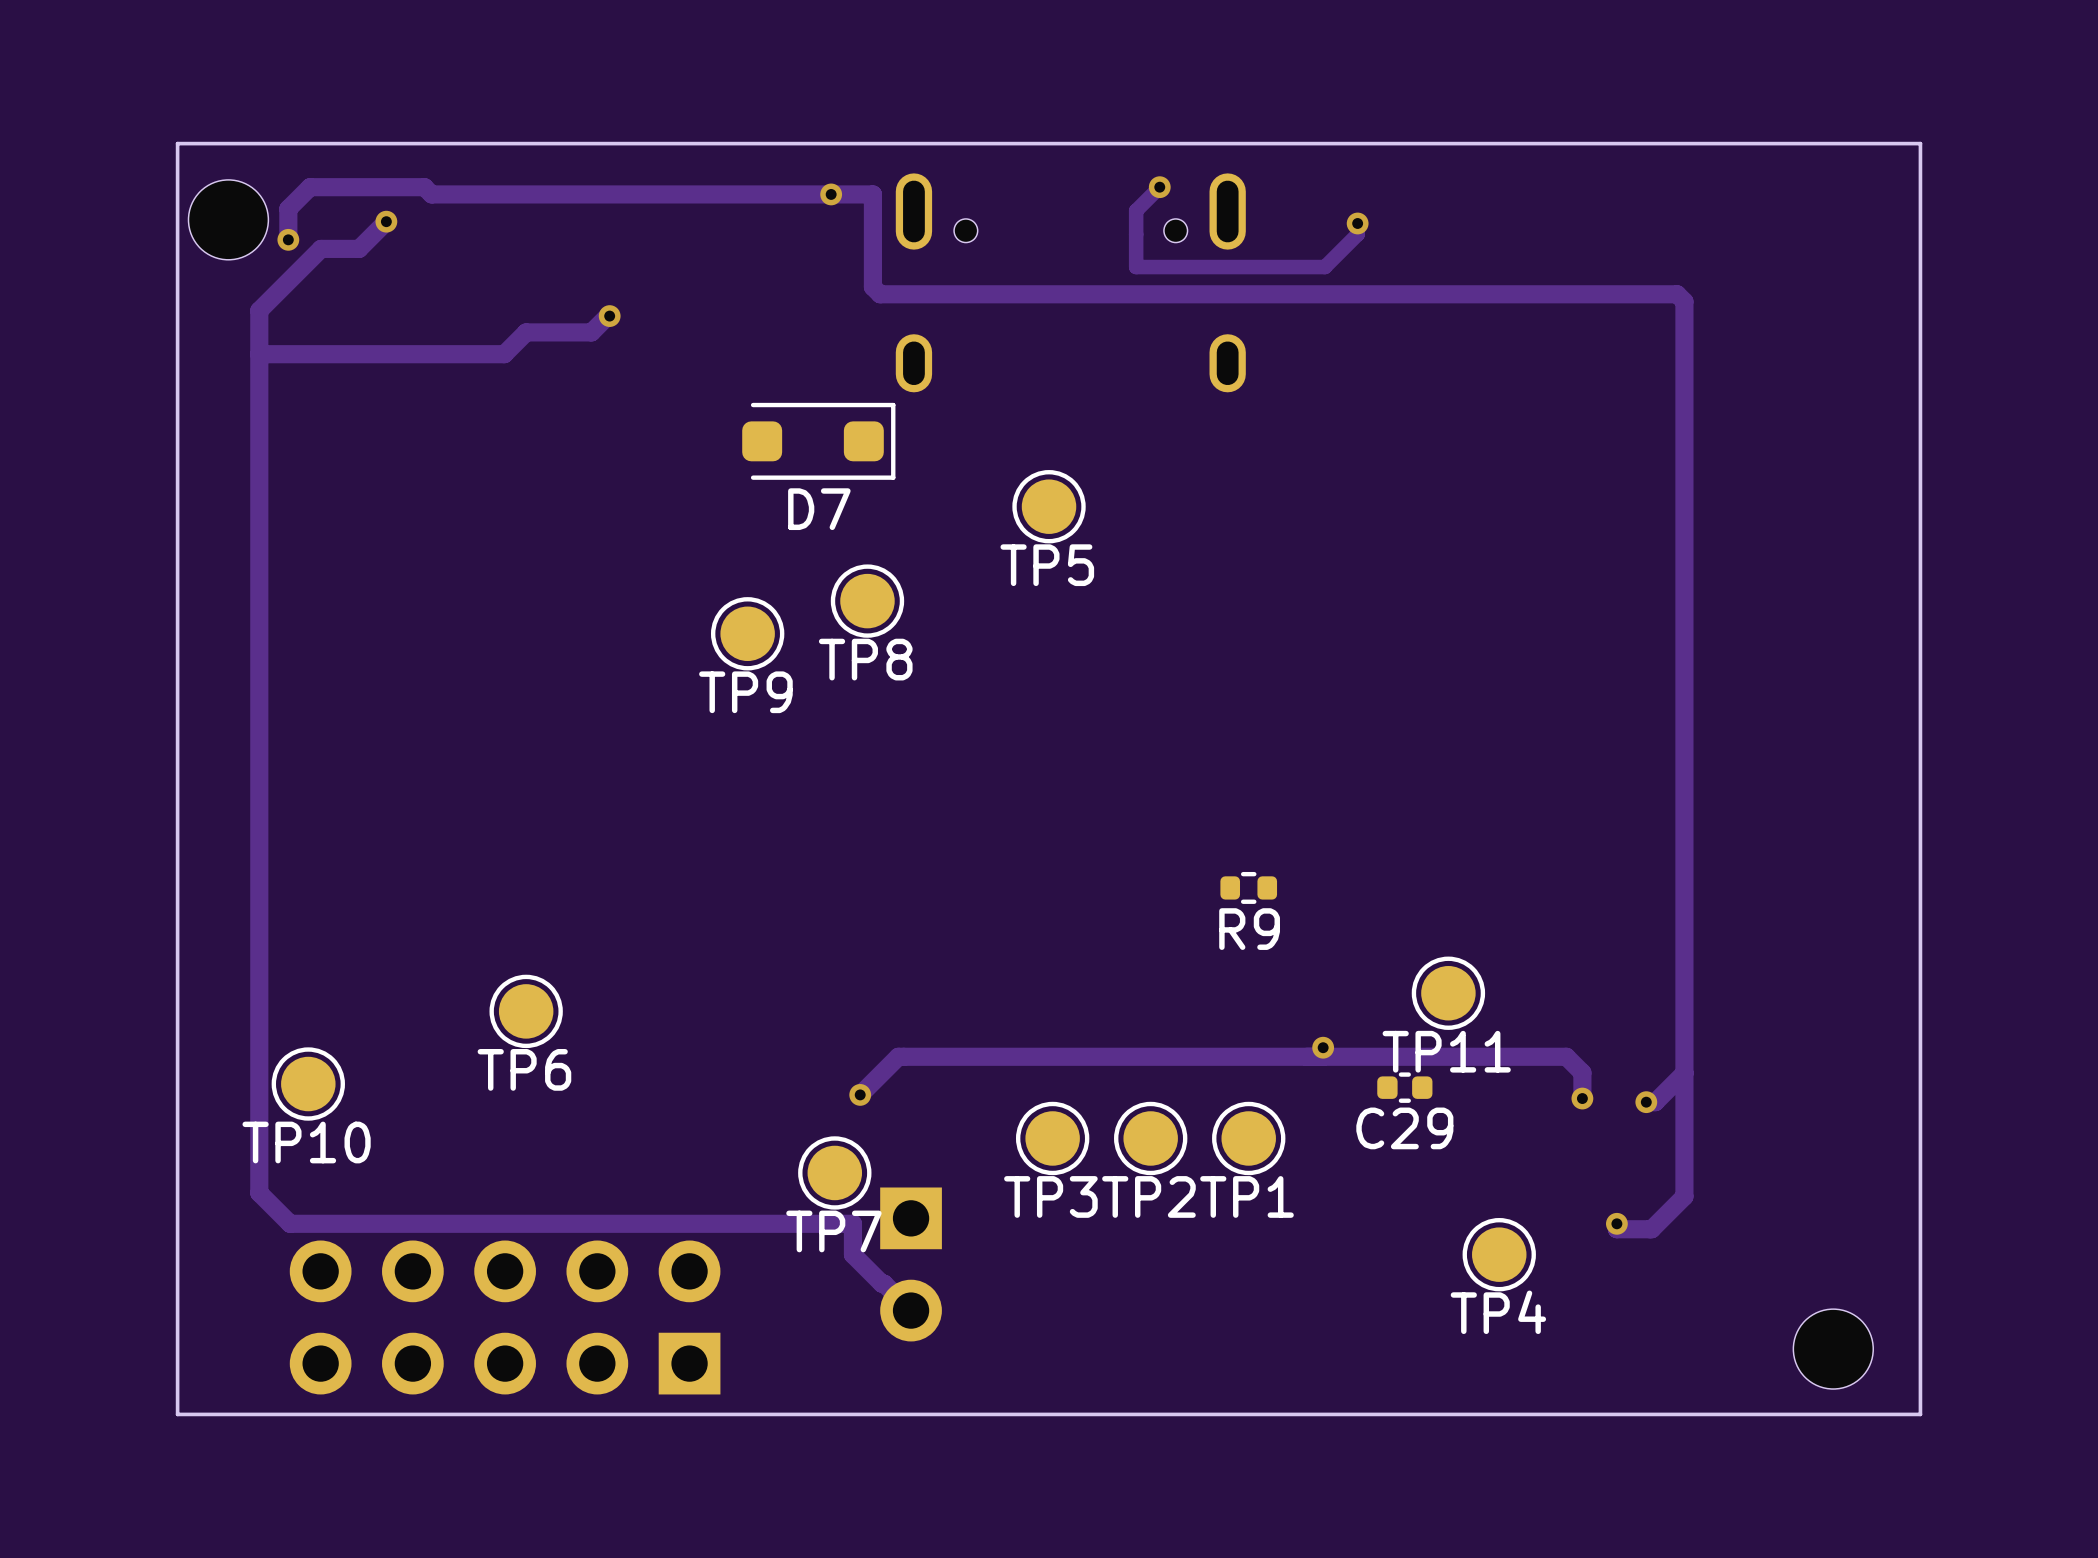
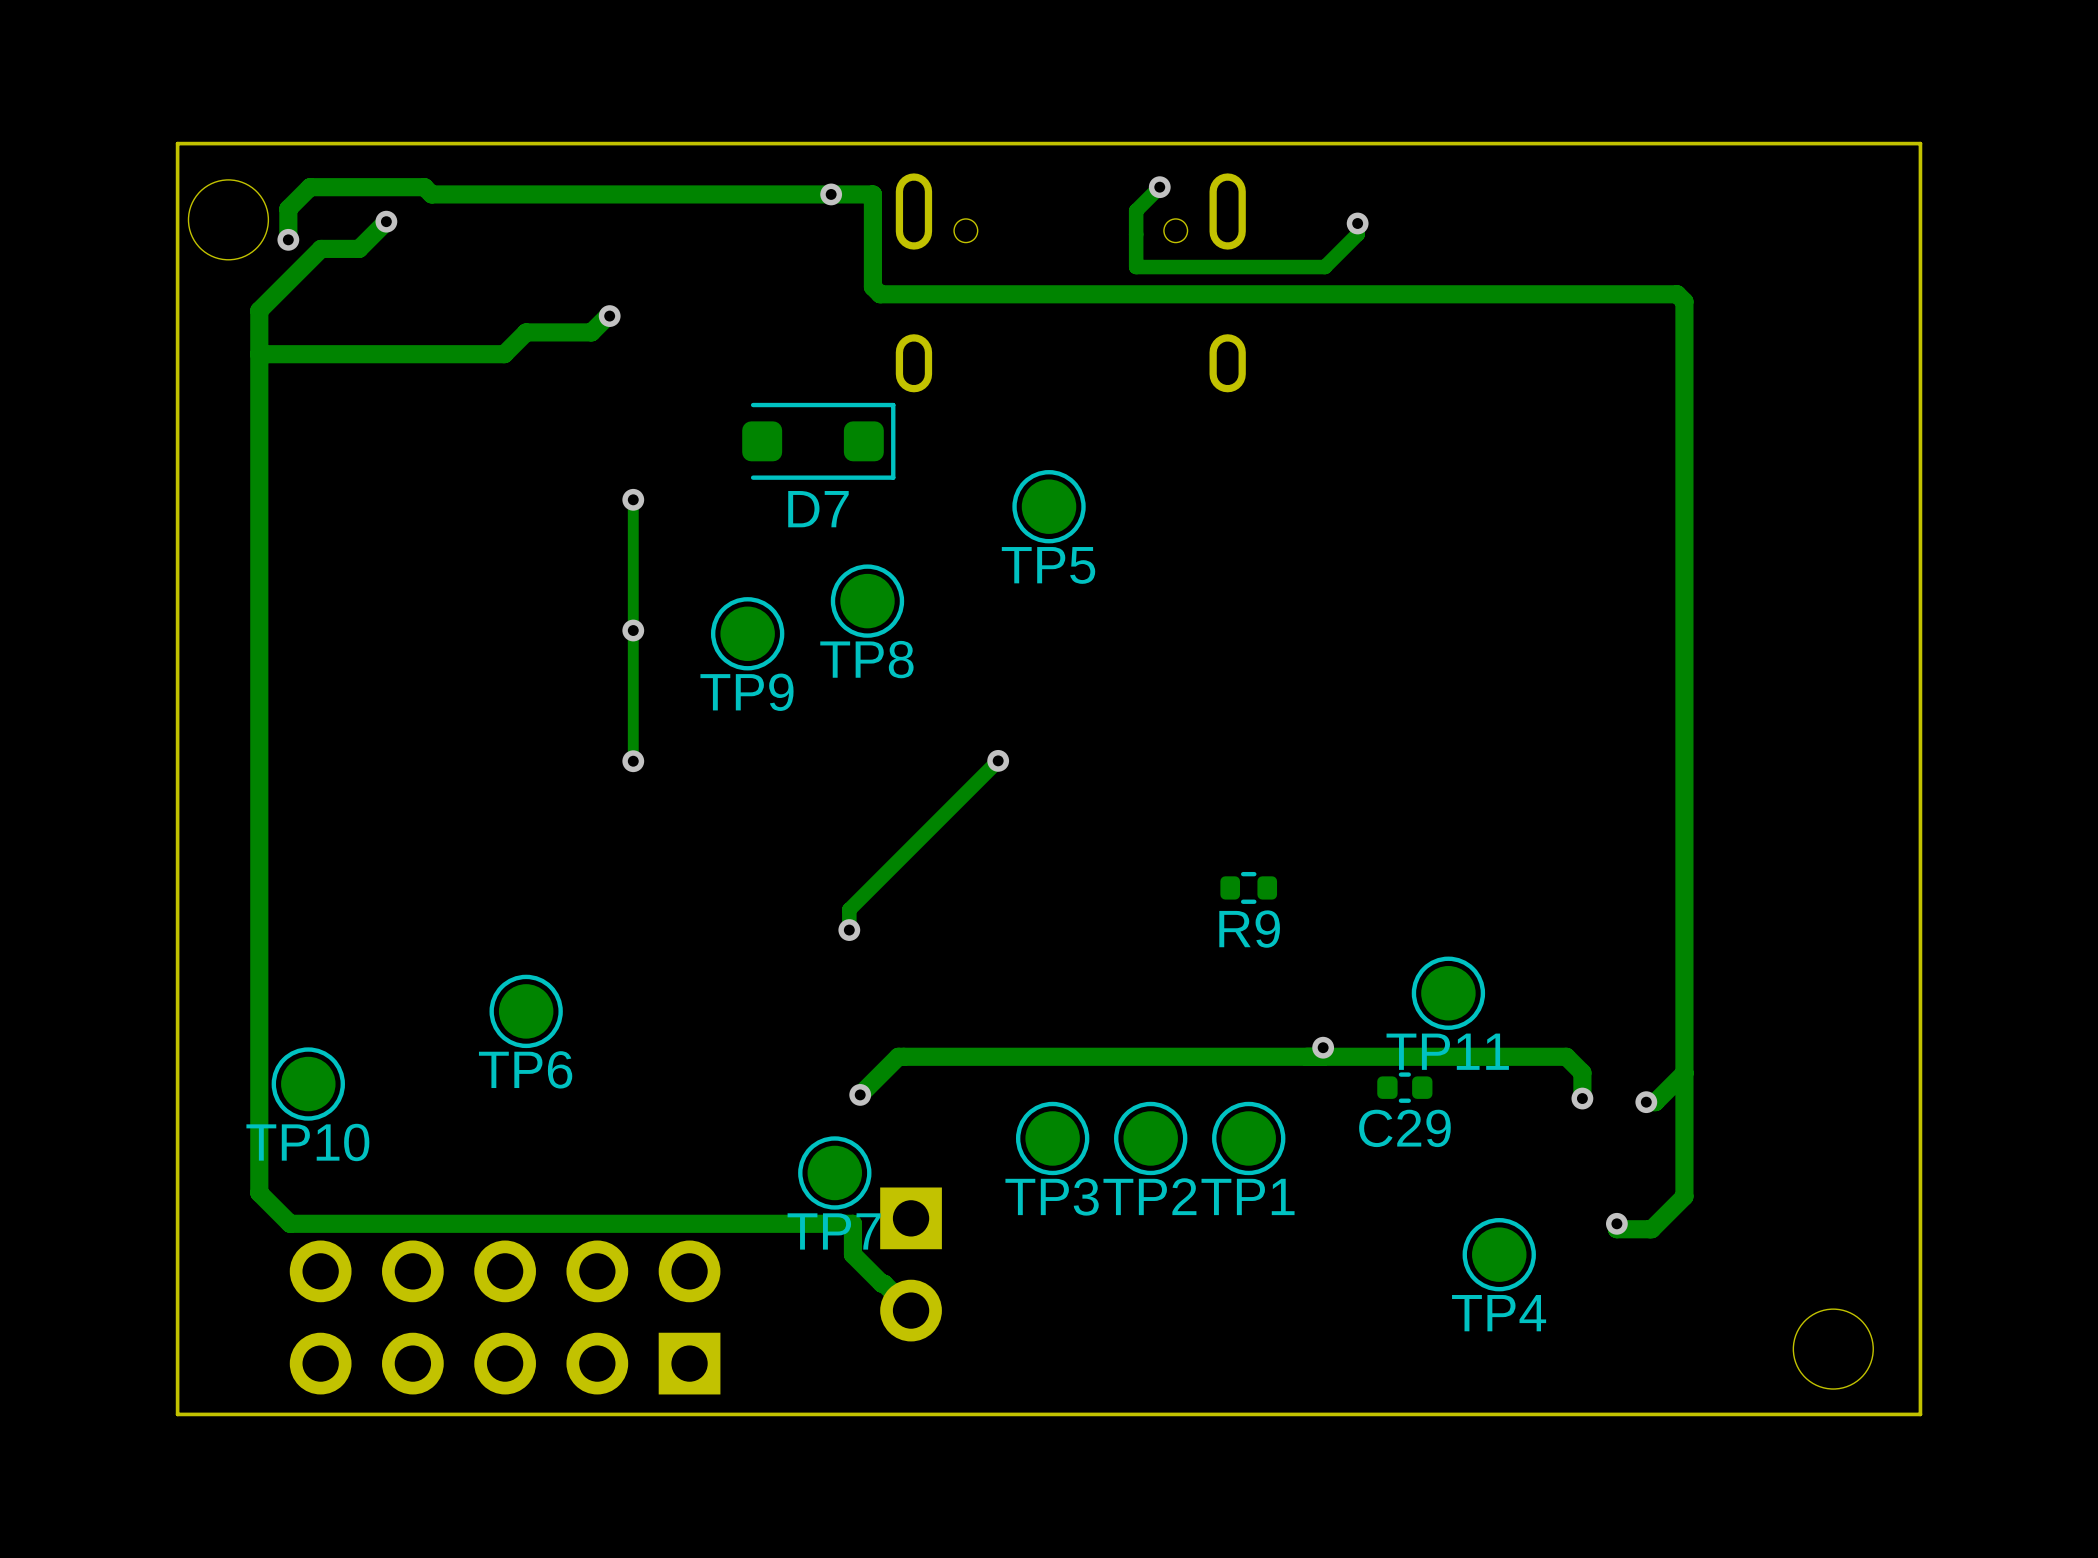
track: none -> (633, 499) (633, 761)
via: none -> (633, 499)
via: none -> (633, 630)
track: none -> (998, 760) (849, 909) (849, 930)
via: none -> (998, 760)
via: none -> (633, 761)
via: none -> (849, 930)

